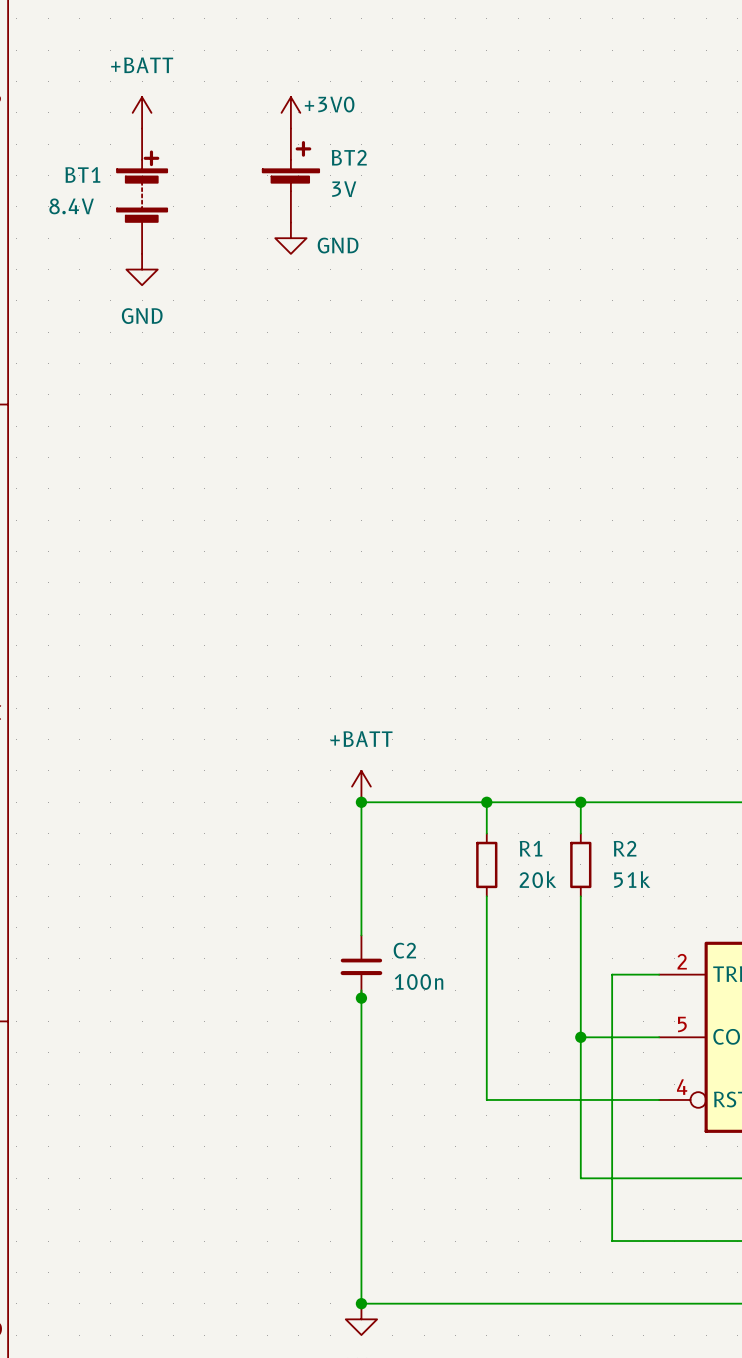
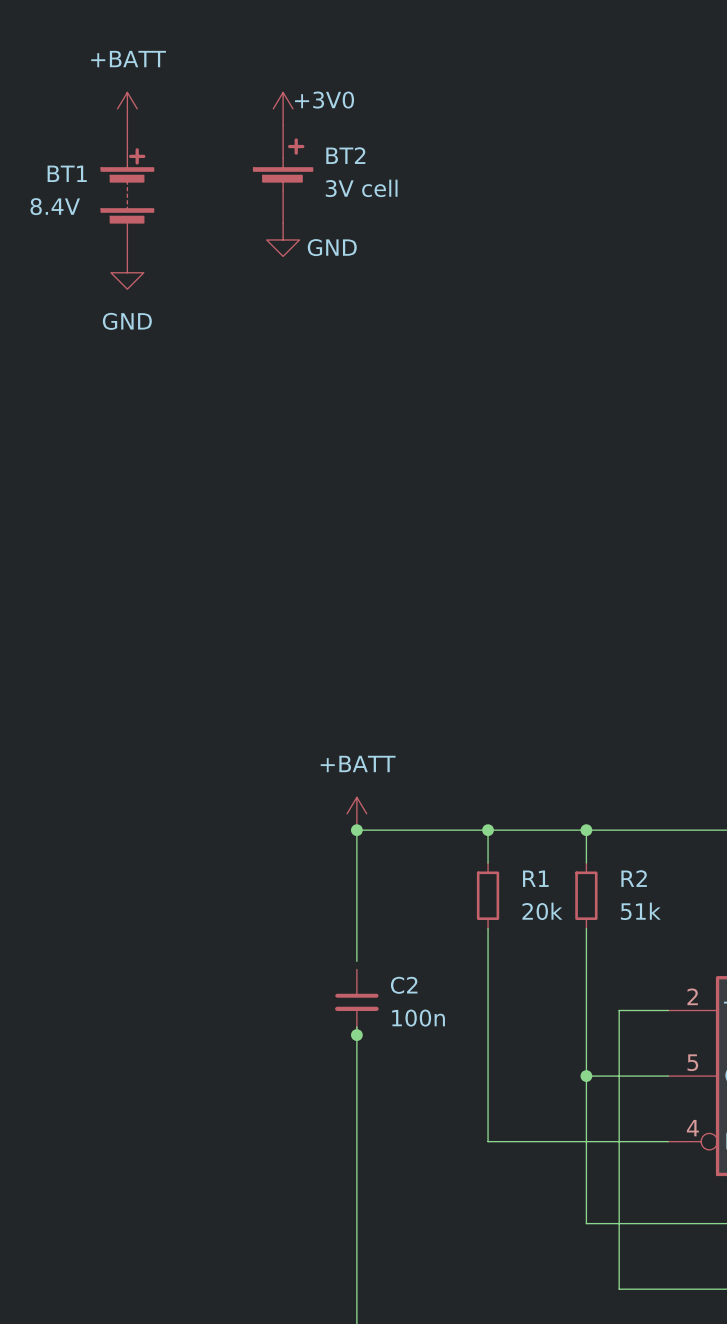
BT2 value: 3V (344, 189) -> 3V cell (361, 188)
wire: (361, 927) (361, 935) -> none

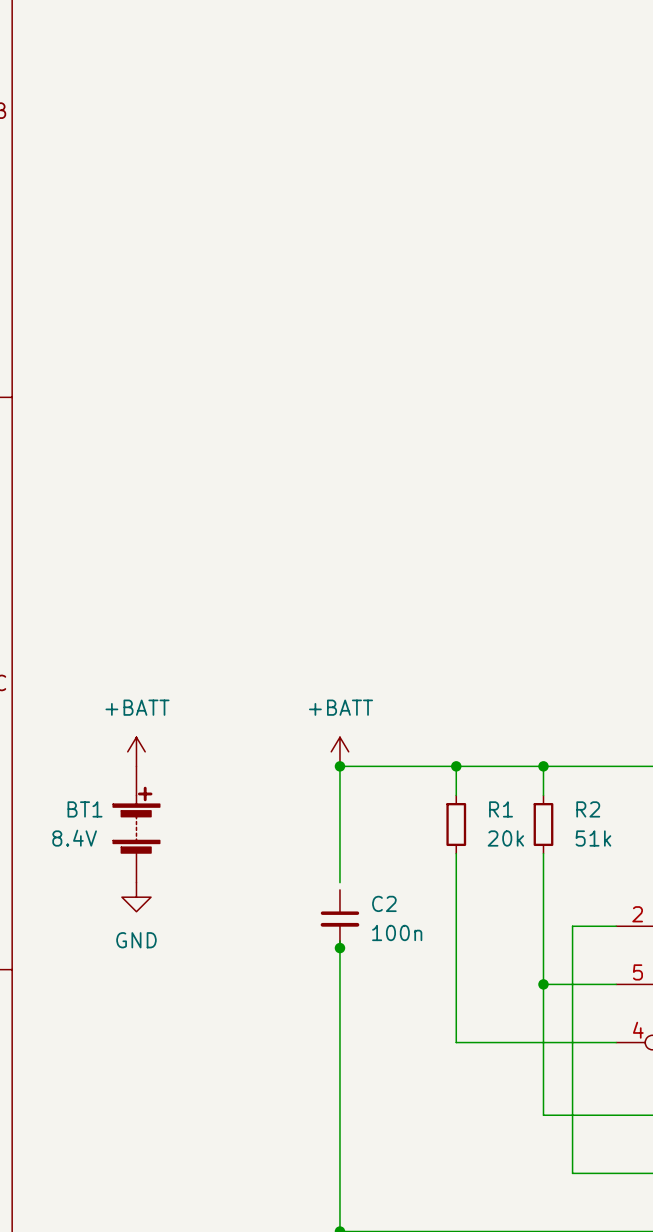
power symbol: +BATT (127, 108) -> none
power symbol: +3V0 (283, 108) -> none
BT2: 3V cell (283, 174) -> none
BT1 position: (127, 190) -> (136, 824)
power symbol: GND (283, 239) -> none
power symbol: GND (127, 272) -> none
power symbol: none -> +BATT (136, 751)
power symbol: none -> GND (136, 897)

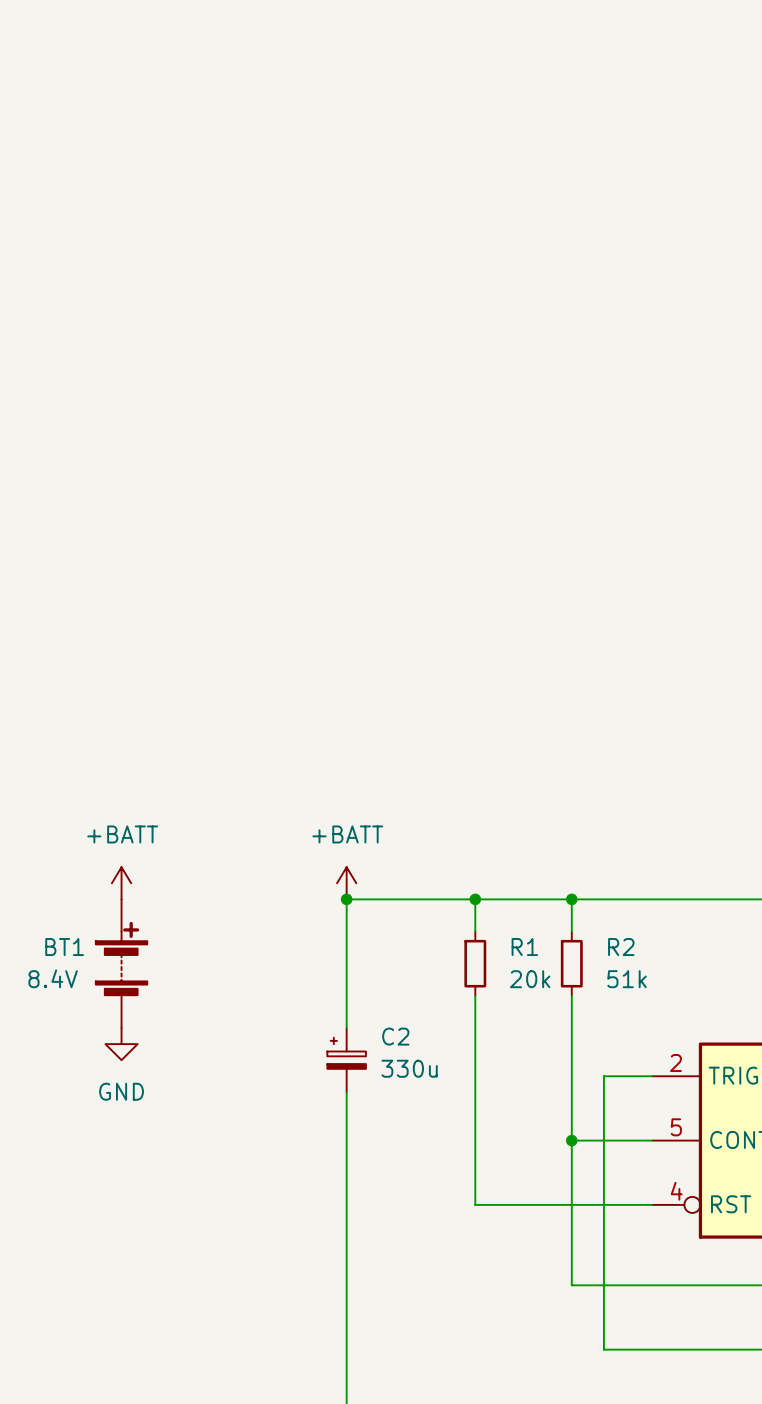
C2 symbol: [320, 889, 360, 949] -> [327, 1028, 366, 1093]
C2 value: 100n (397, 932) -> 330u (409, 1068)
junction: (339, 948) -> none

